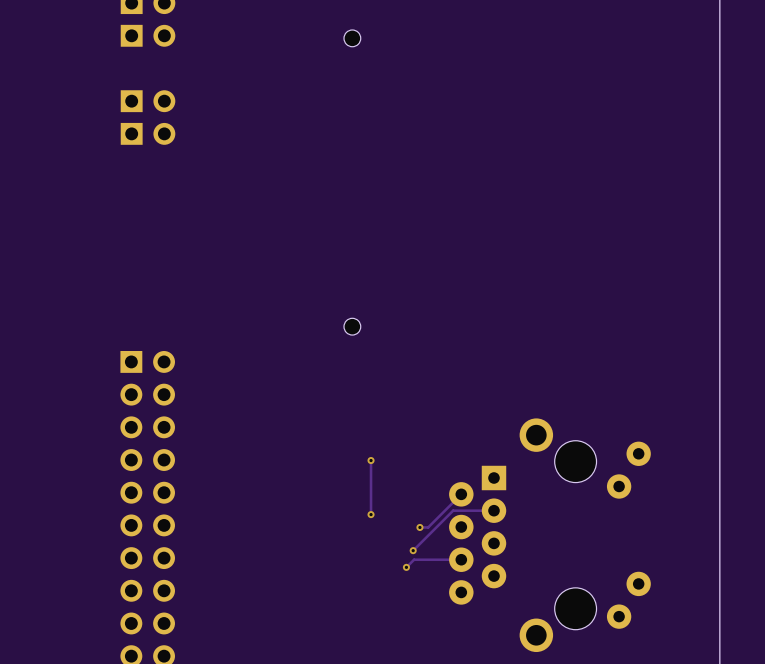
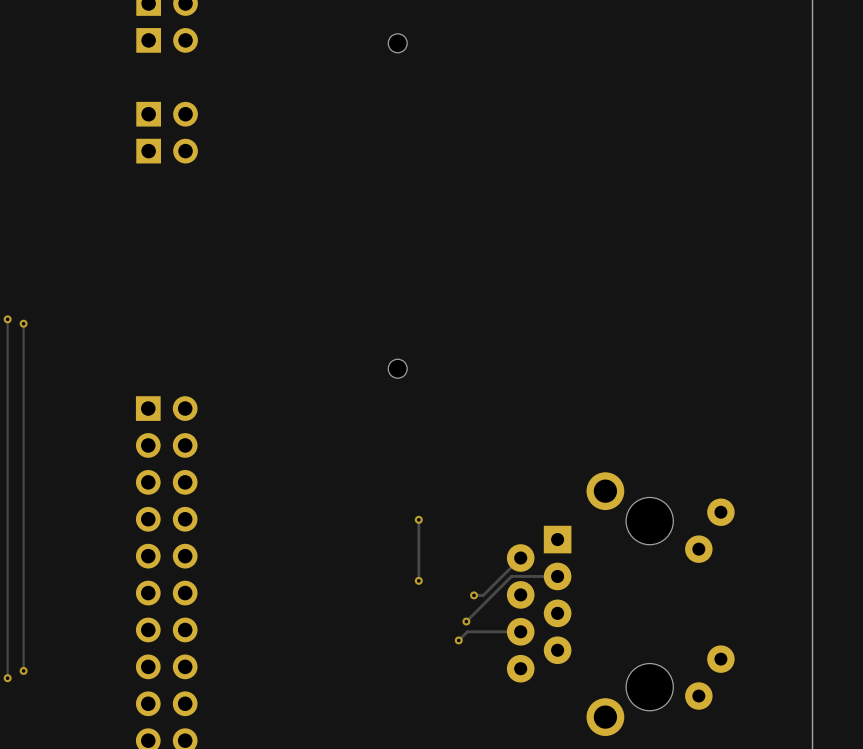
track: none -> (7, 319) (7, 678)
via: none -> (7, 319)
track: none -> (23, 323) (23, 670)
via: none -> (23, 323)
via: none -> (23, 670)
via: none -> (7, 678)

